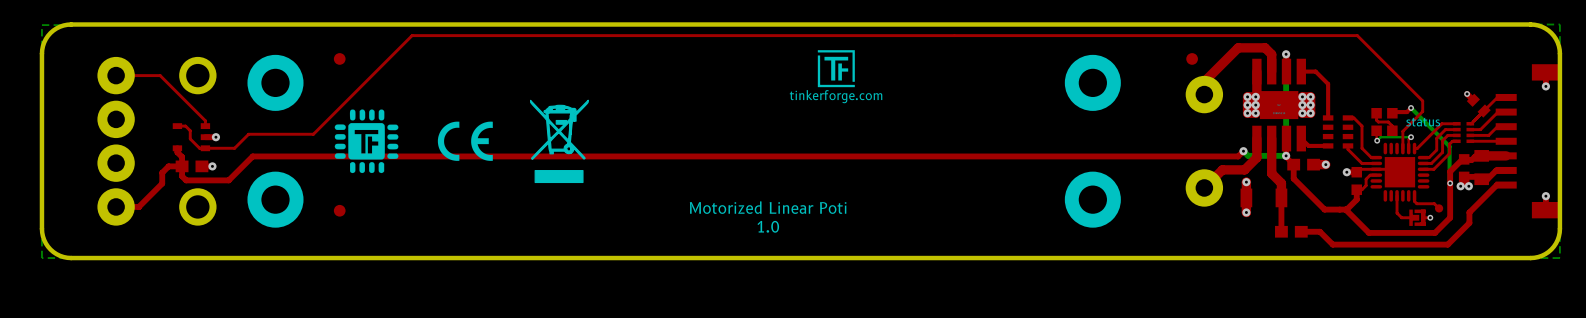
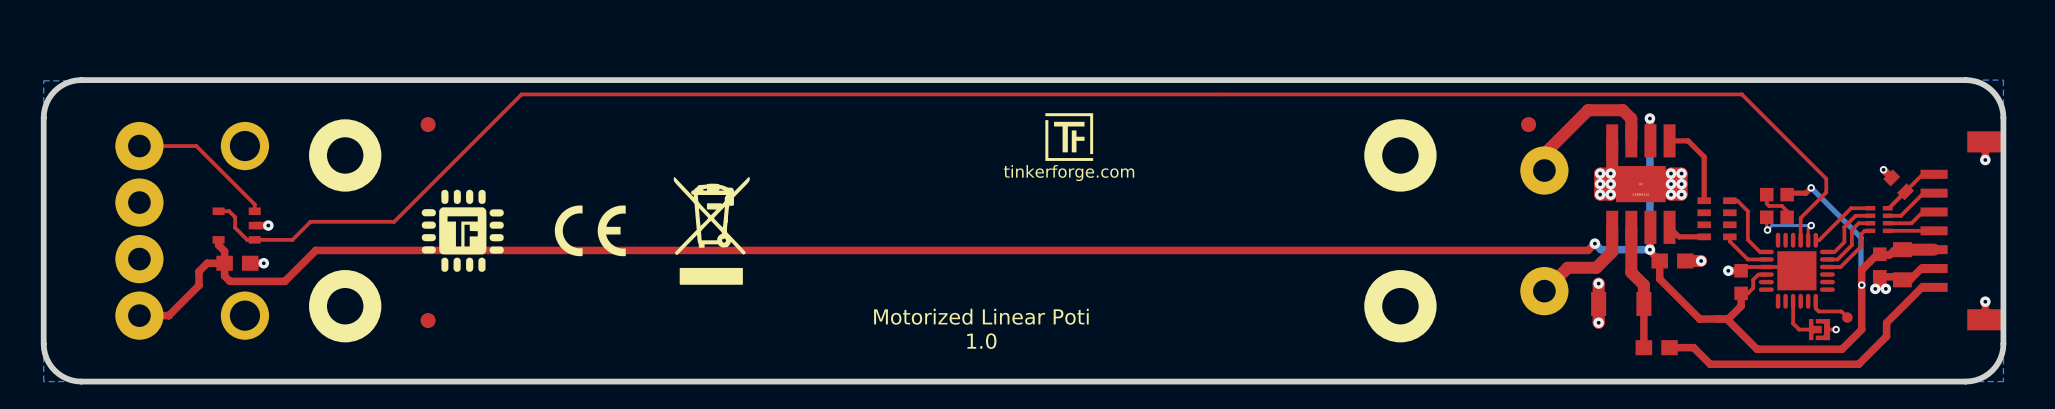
text: status (1423, 122) -> none

